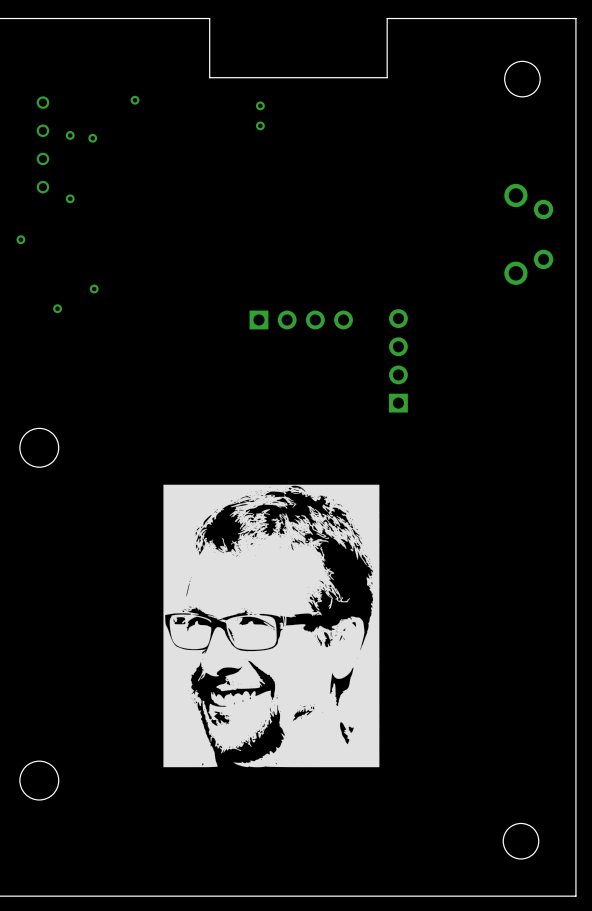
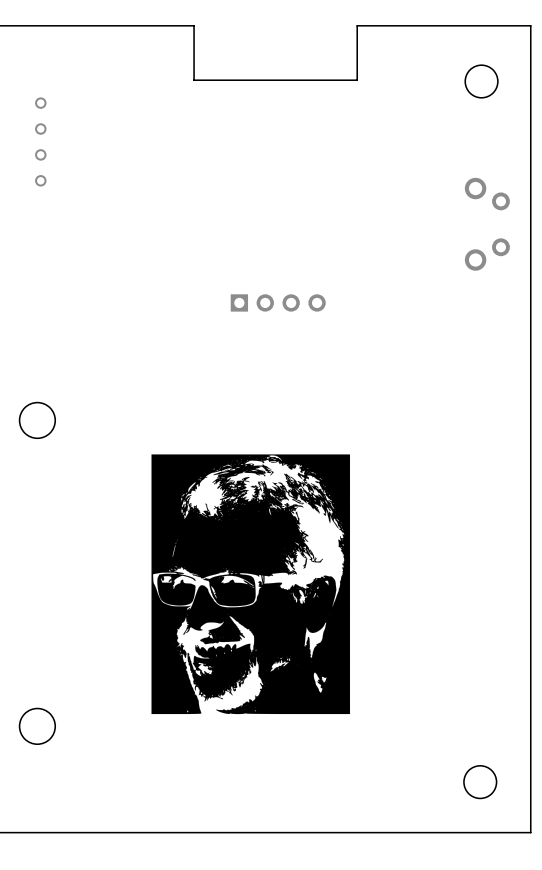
via: (135, 100) -> none
via: (260, 105) -> none
via: (260, 125) -> none
via: (70, 135) -> none
via: (92, 138) -> none
via: (70, 198) -> none
via: (20, 239) -> none
via: (94, 288) -> none
via: (57, 308) -> none
part: (398, 360) -> none

